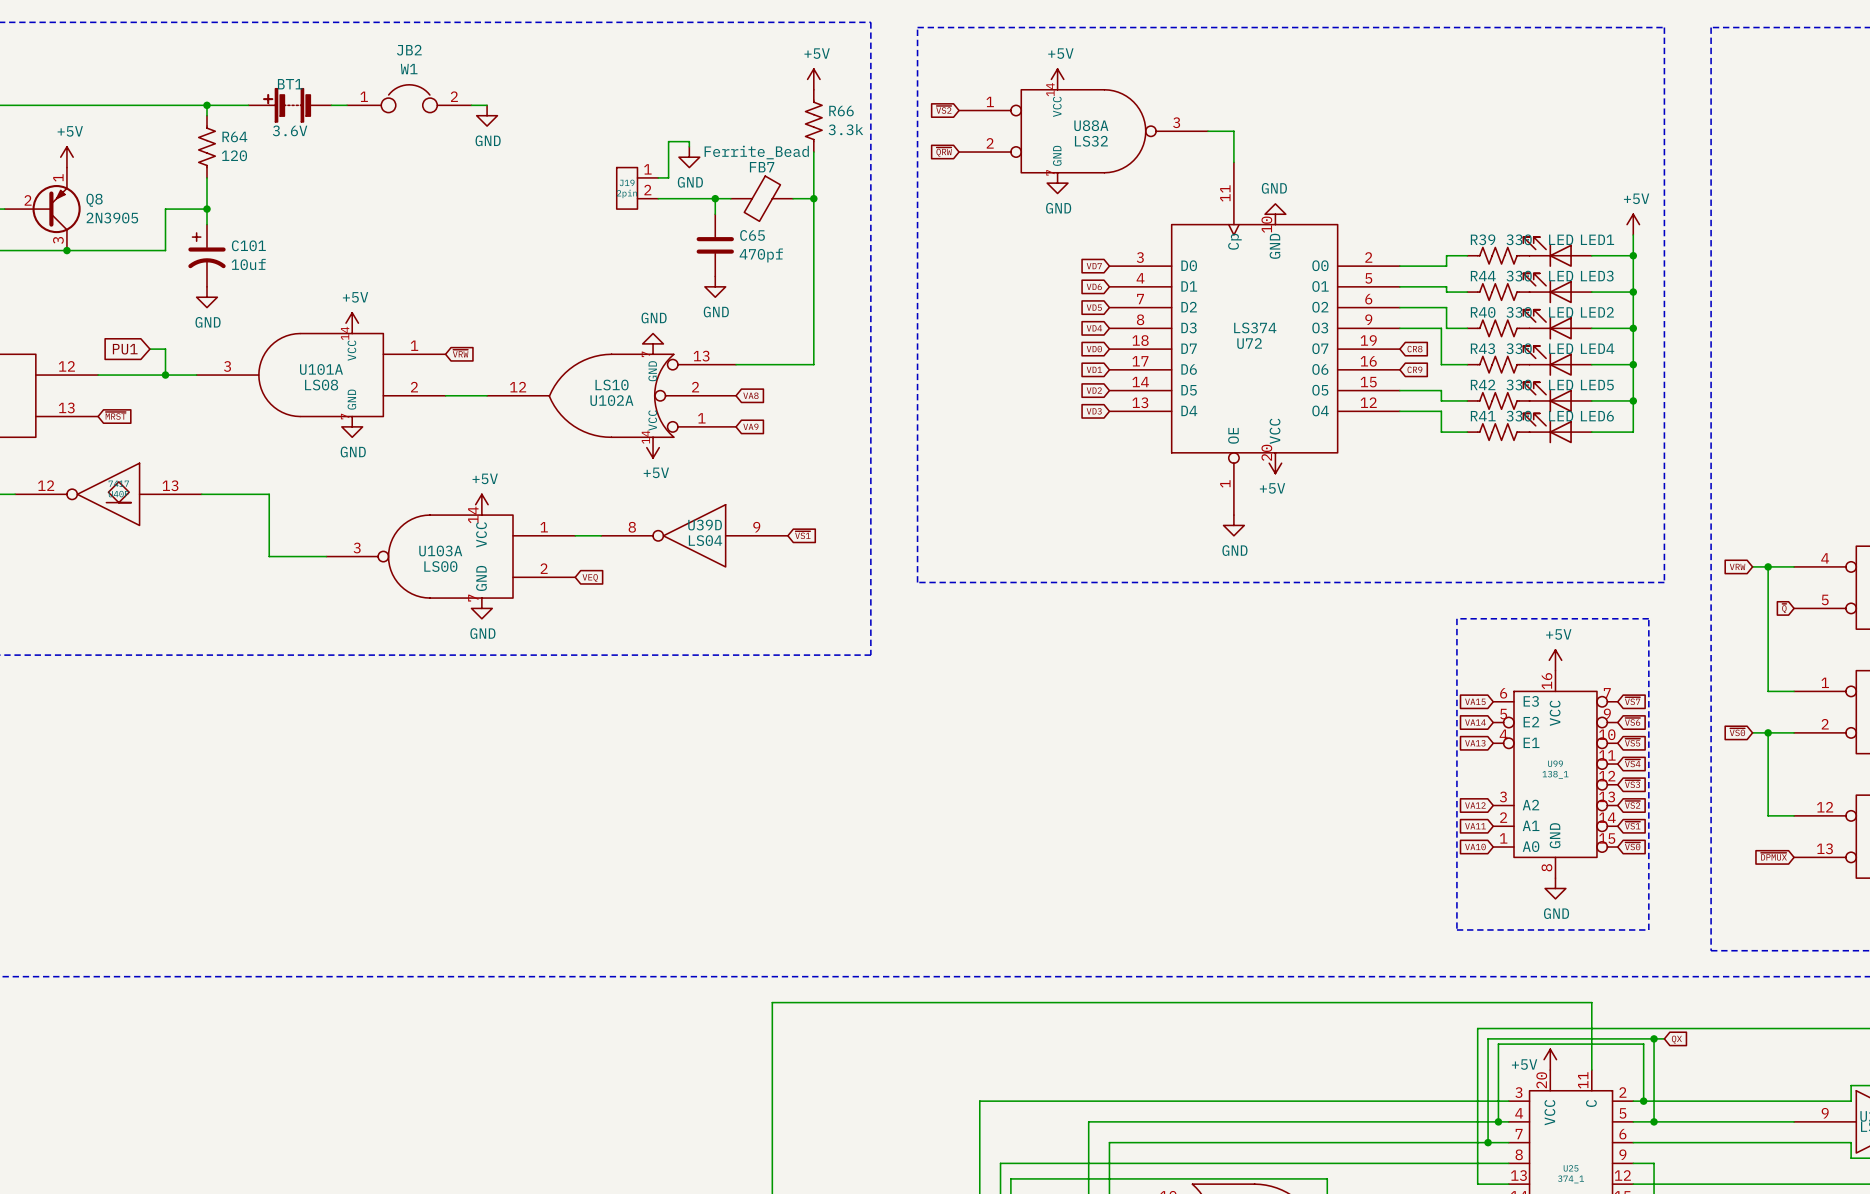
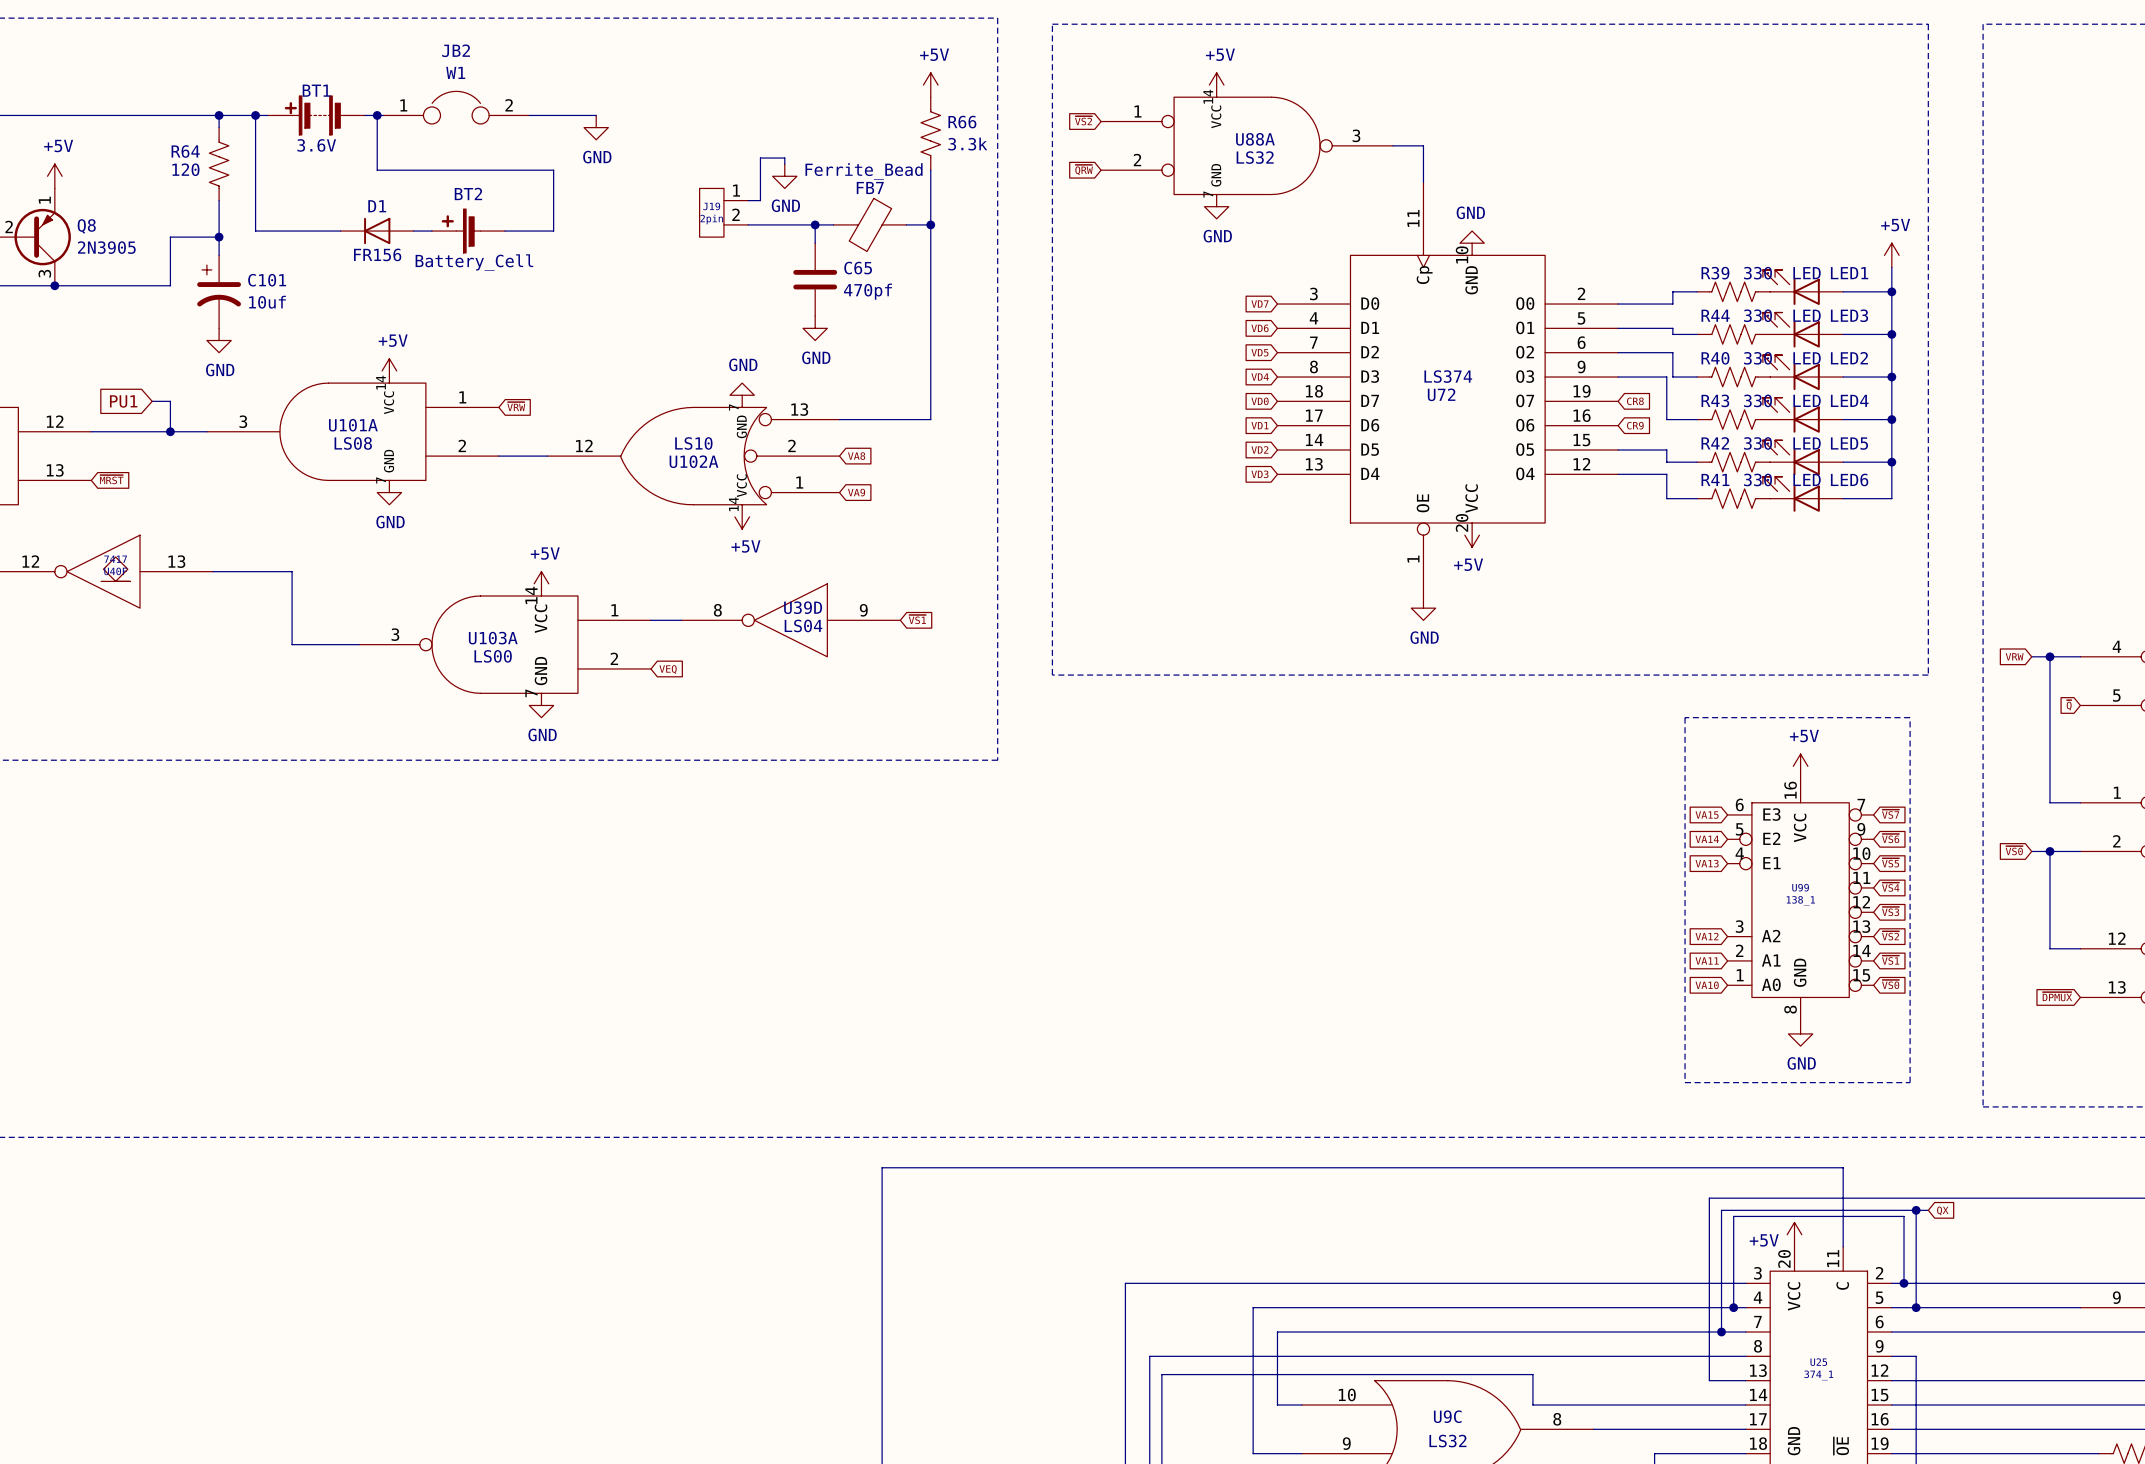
wire: none -> (255, 115) (255, 231) (340, 231)
junction: none -> (255, 115)
wire: none -> (377, 115) (377, 170) (553, 170) (553, 231) (504, 231)
junction: none -> (377, 115)
wire: none -> (547, 115) (596, 115)
power symbol position: GND (487, 115) -> GND (596, 127)
R64 name position: R64 (234, 136) -> R64 (185, 151)
R64 value position: 120 (234, 155) -> 120 (185, 169)
D1: none -> FR156 (377, 231)
wire: none -> (413, 231) (431, 231)
BT2: none -> Battery_Cell (468, 231)

